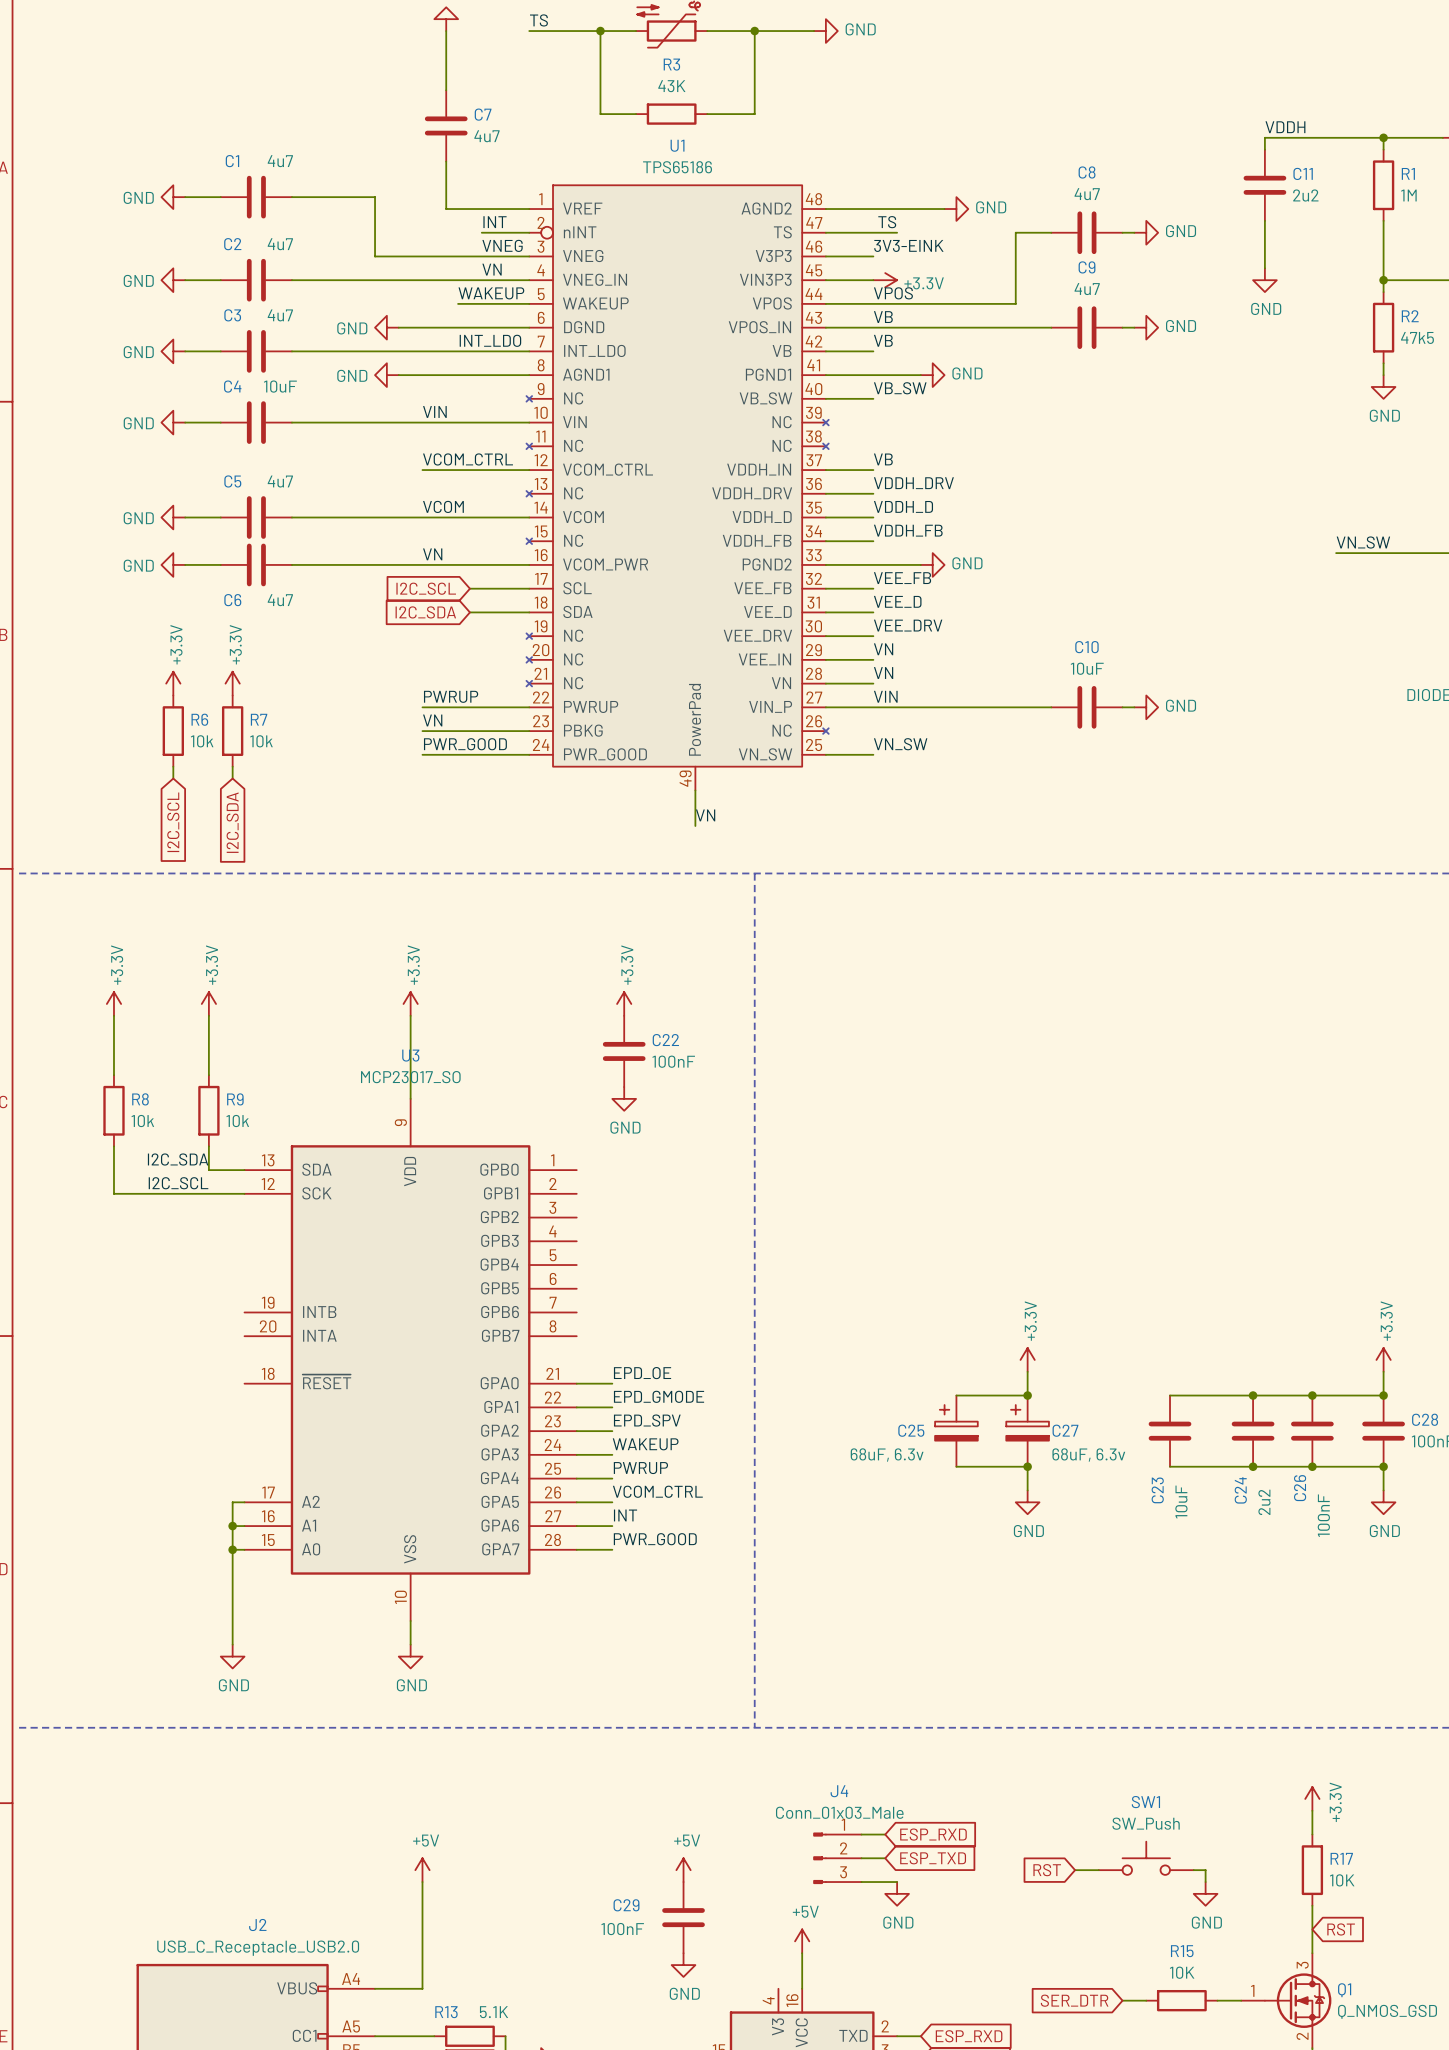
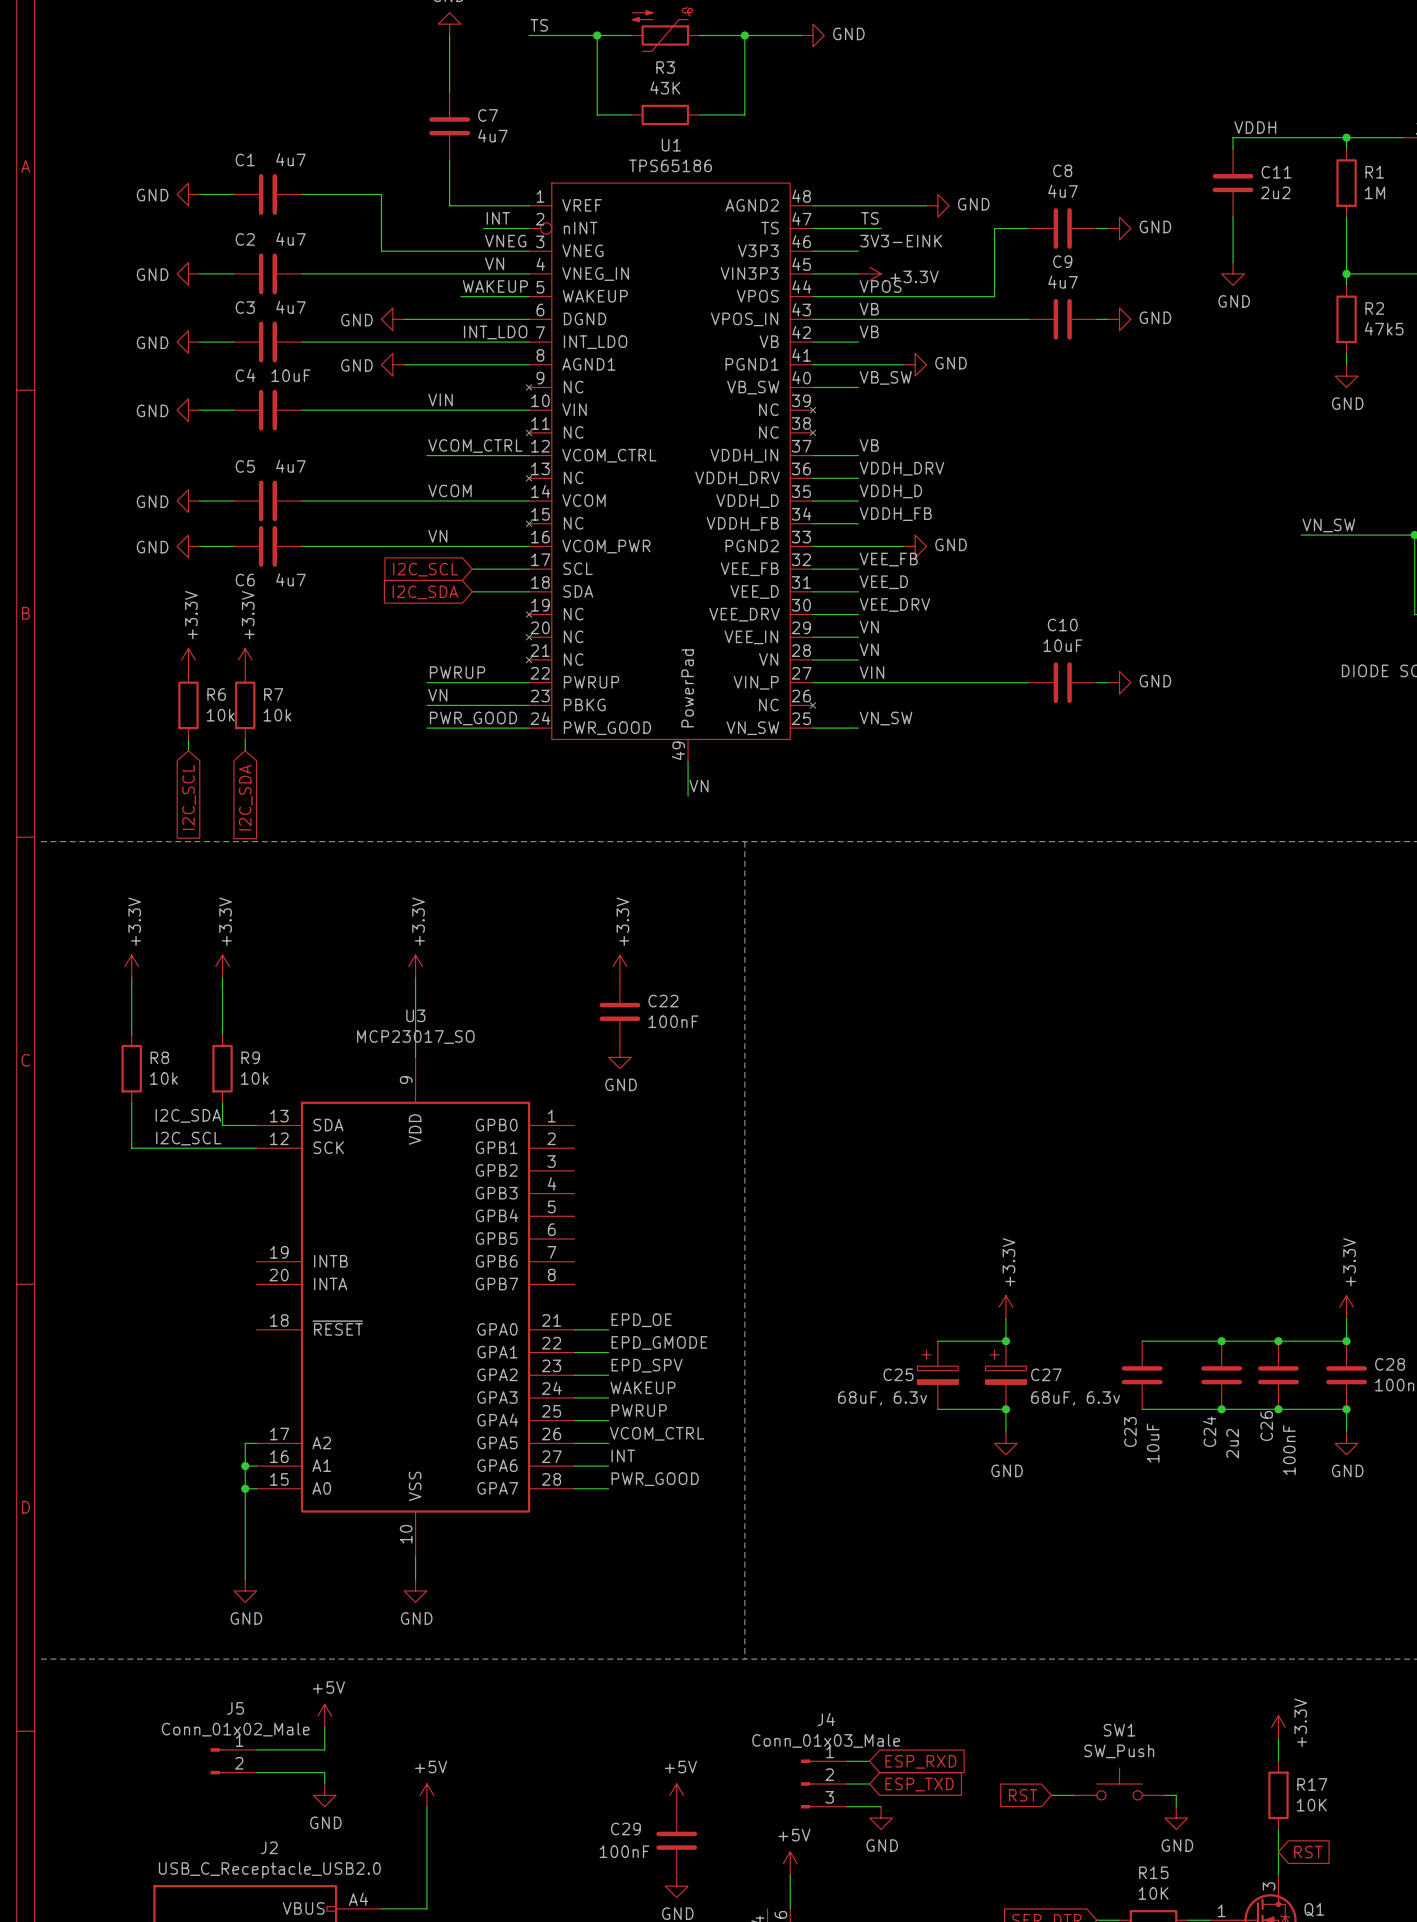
power symbol: none -> +5V (324, 1715)
wire: none -> (324, 1727) (324, 1749) (256, 1749)
J5: none -> Conn_01x02_Male (233, 1761)
wire: none -> (256, 1772) (324, 1772) (324, 1784)
power symbol: none -> GND (324, 1795)

